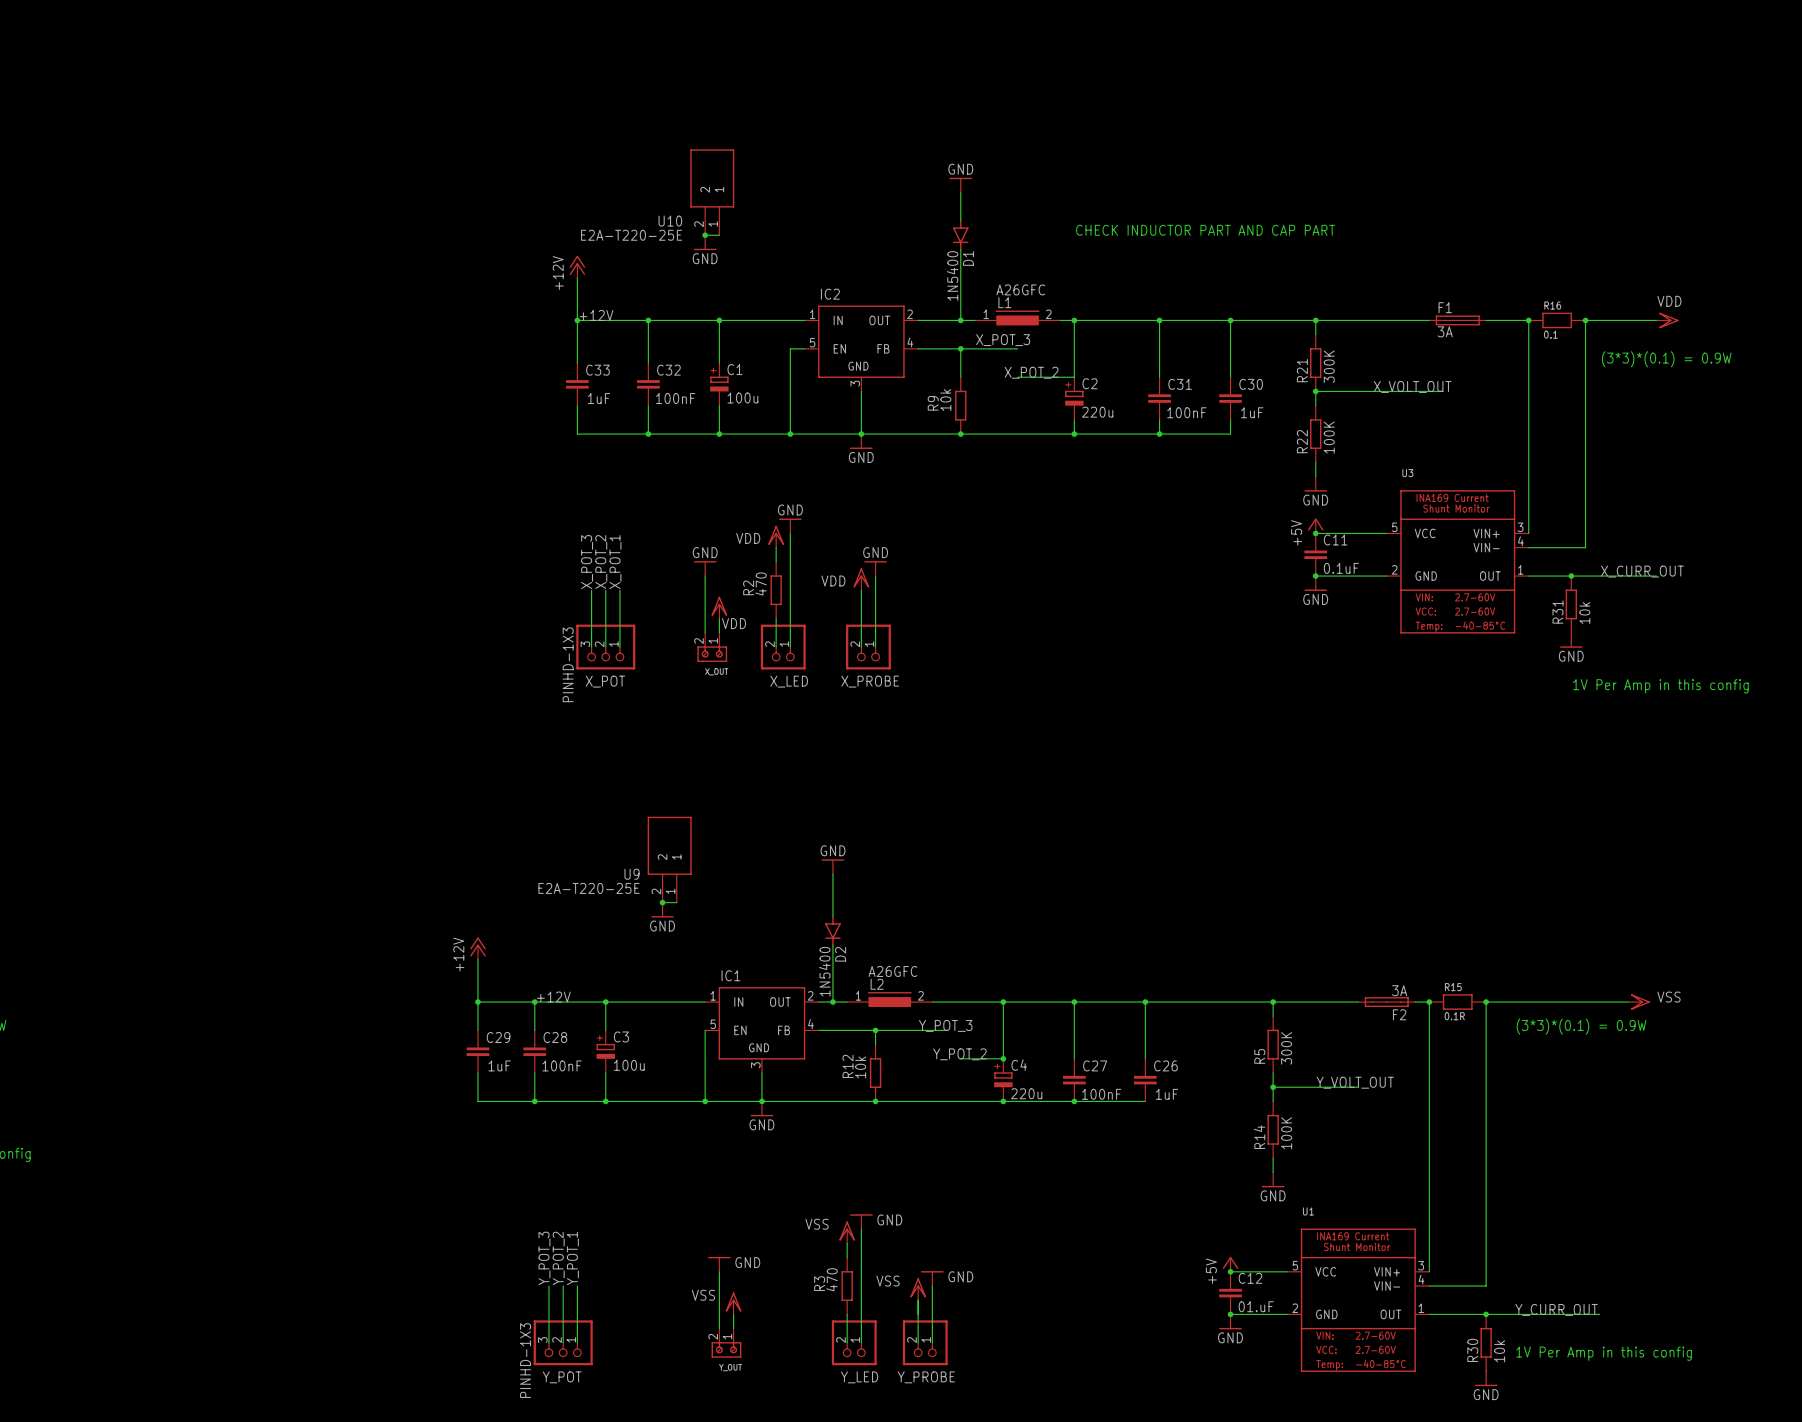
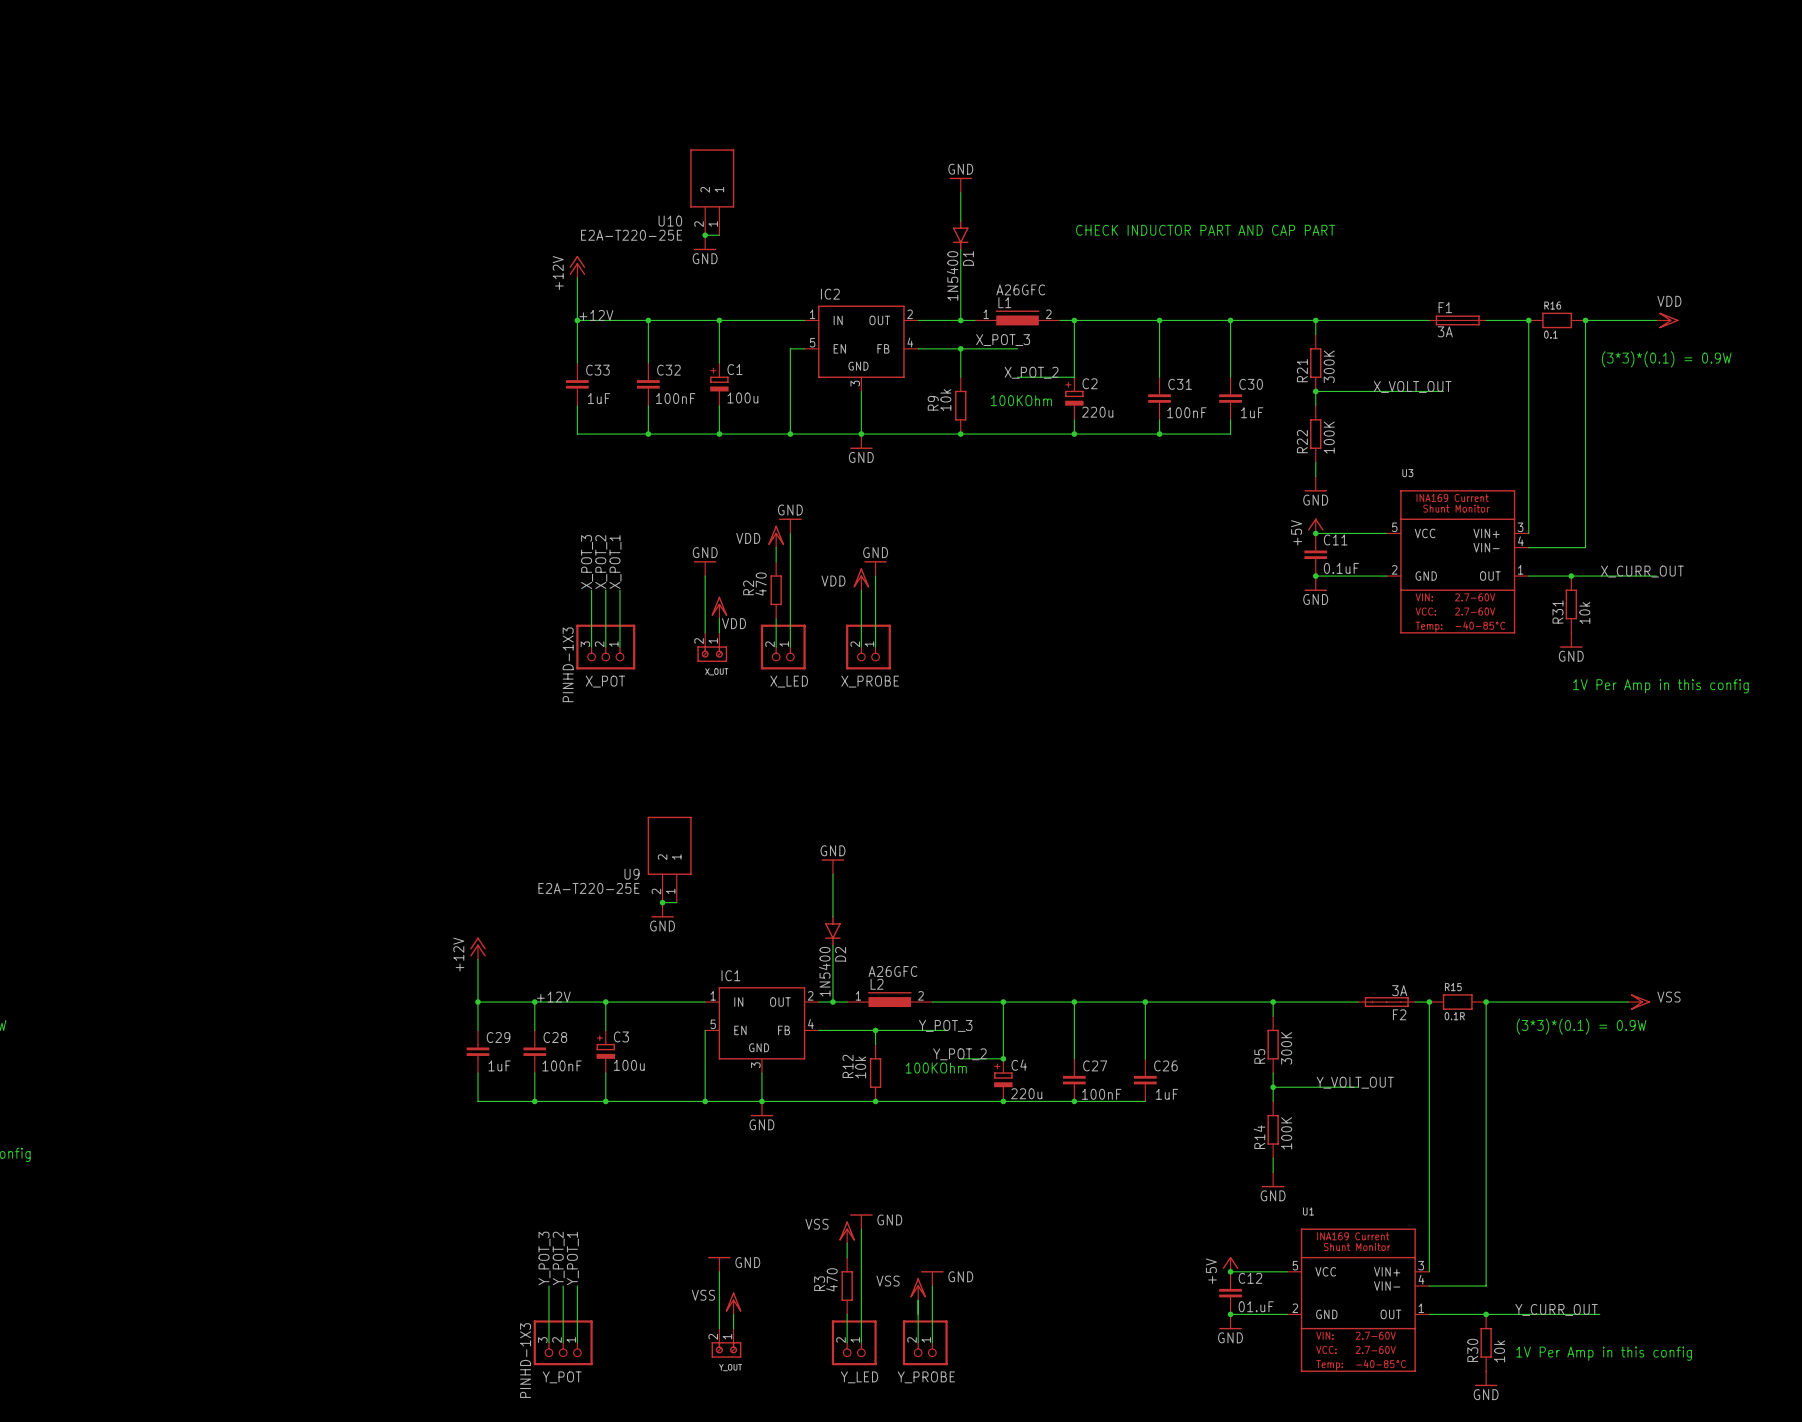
text: none -> 100KOhm (1021, 400)
text: none -> 100KOhm (936, 1068)

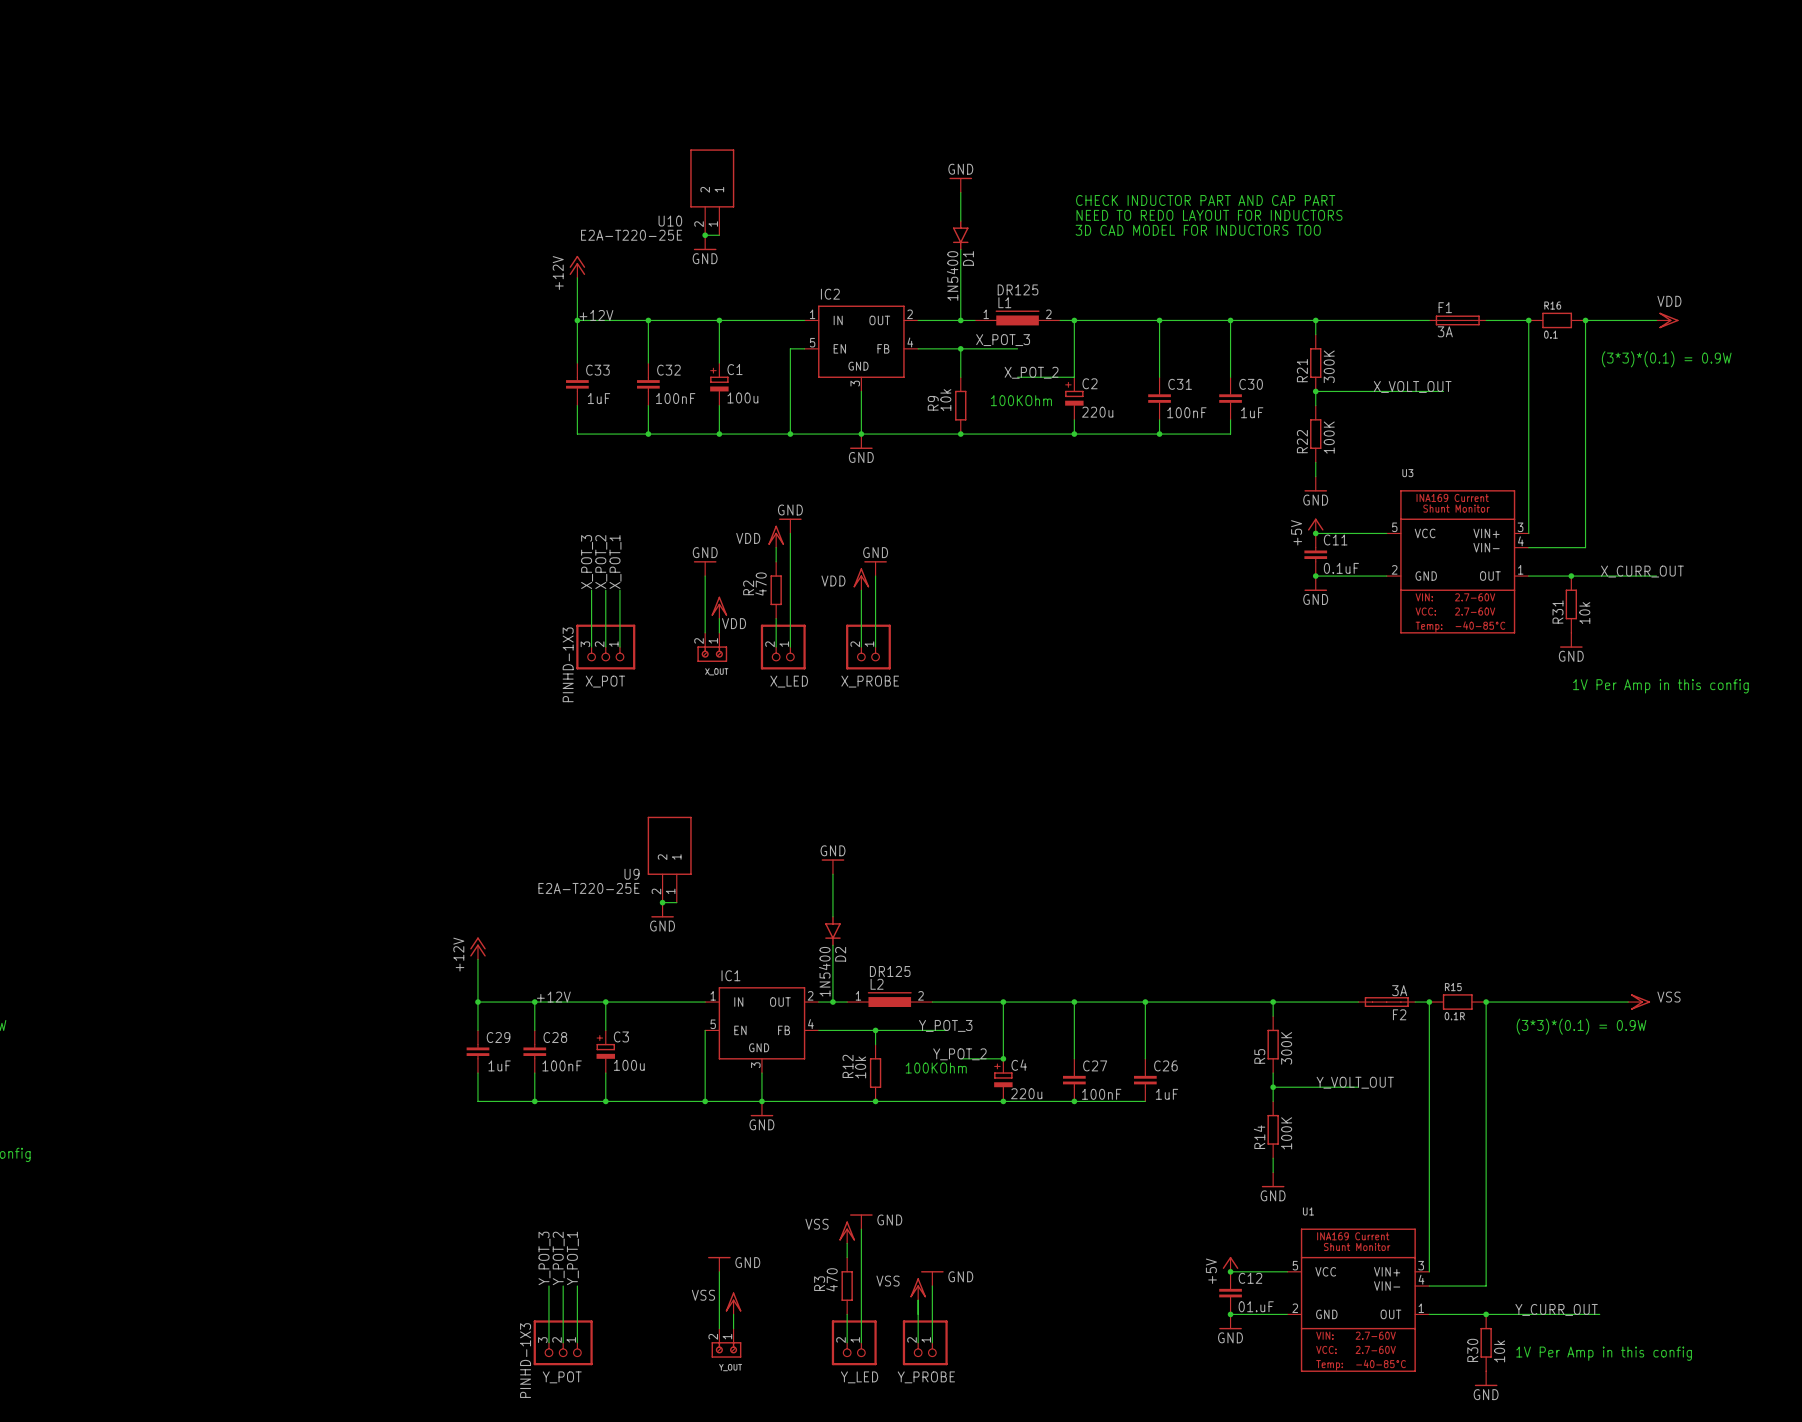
text: none -> CHECK INDUCTOR PART AND CAP PART (1205, 200)
text: none -> NEED TO REDO LAYOUT FOR INDUCTORS (1209, 215)
text: CHECK INDUCTOR PART AND CAP PART (1205, 230) -> 3D CAD MODEL FOR INDUCTORS TOO (1198, 230)
L1 value: A26GFC (1020, 289) -> DR125 (1018, 289)
L2 value: A26GFC (892, 971) -> DR125 (890, 971)

